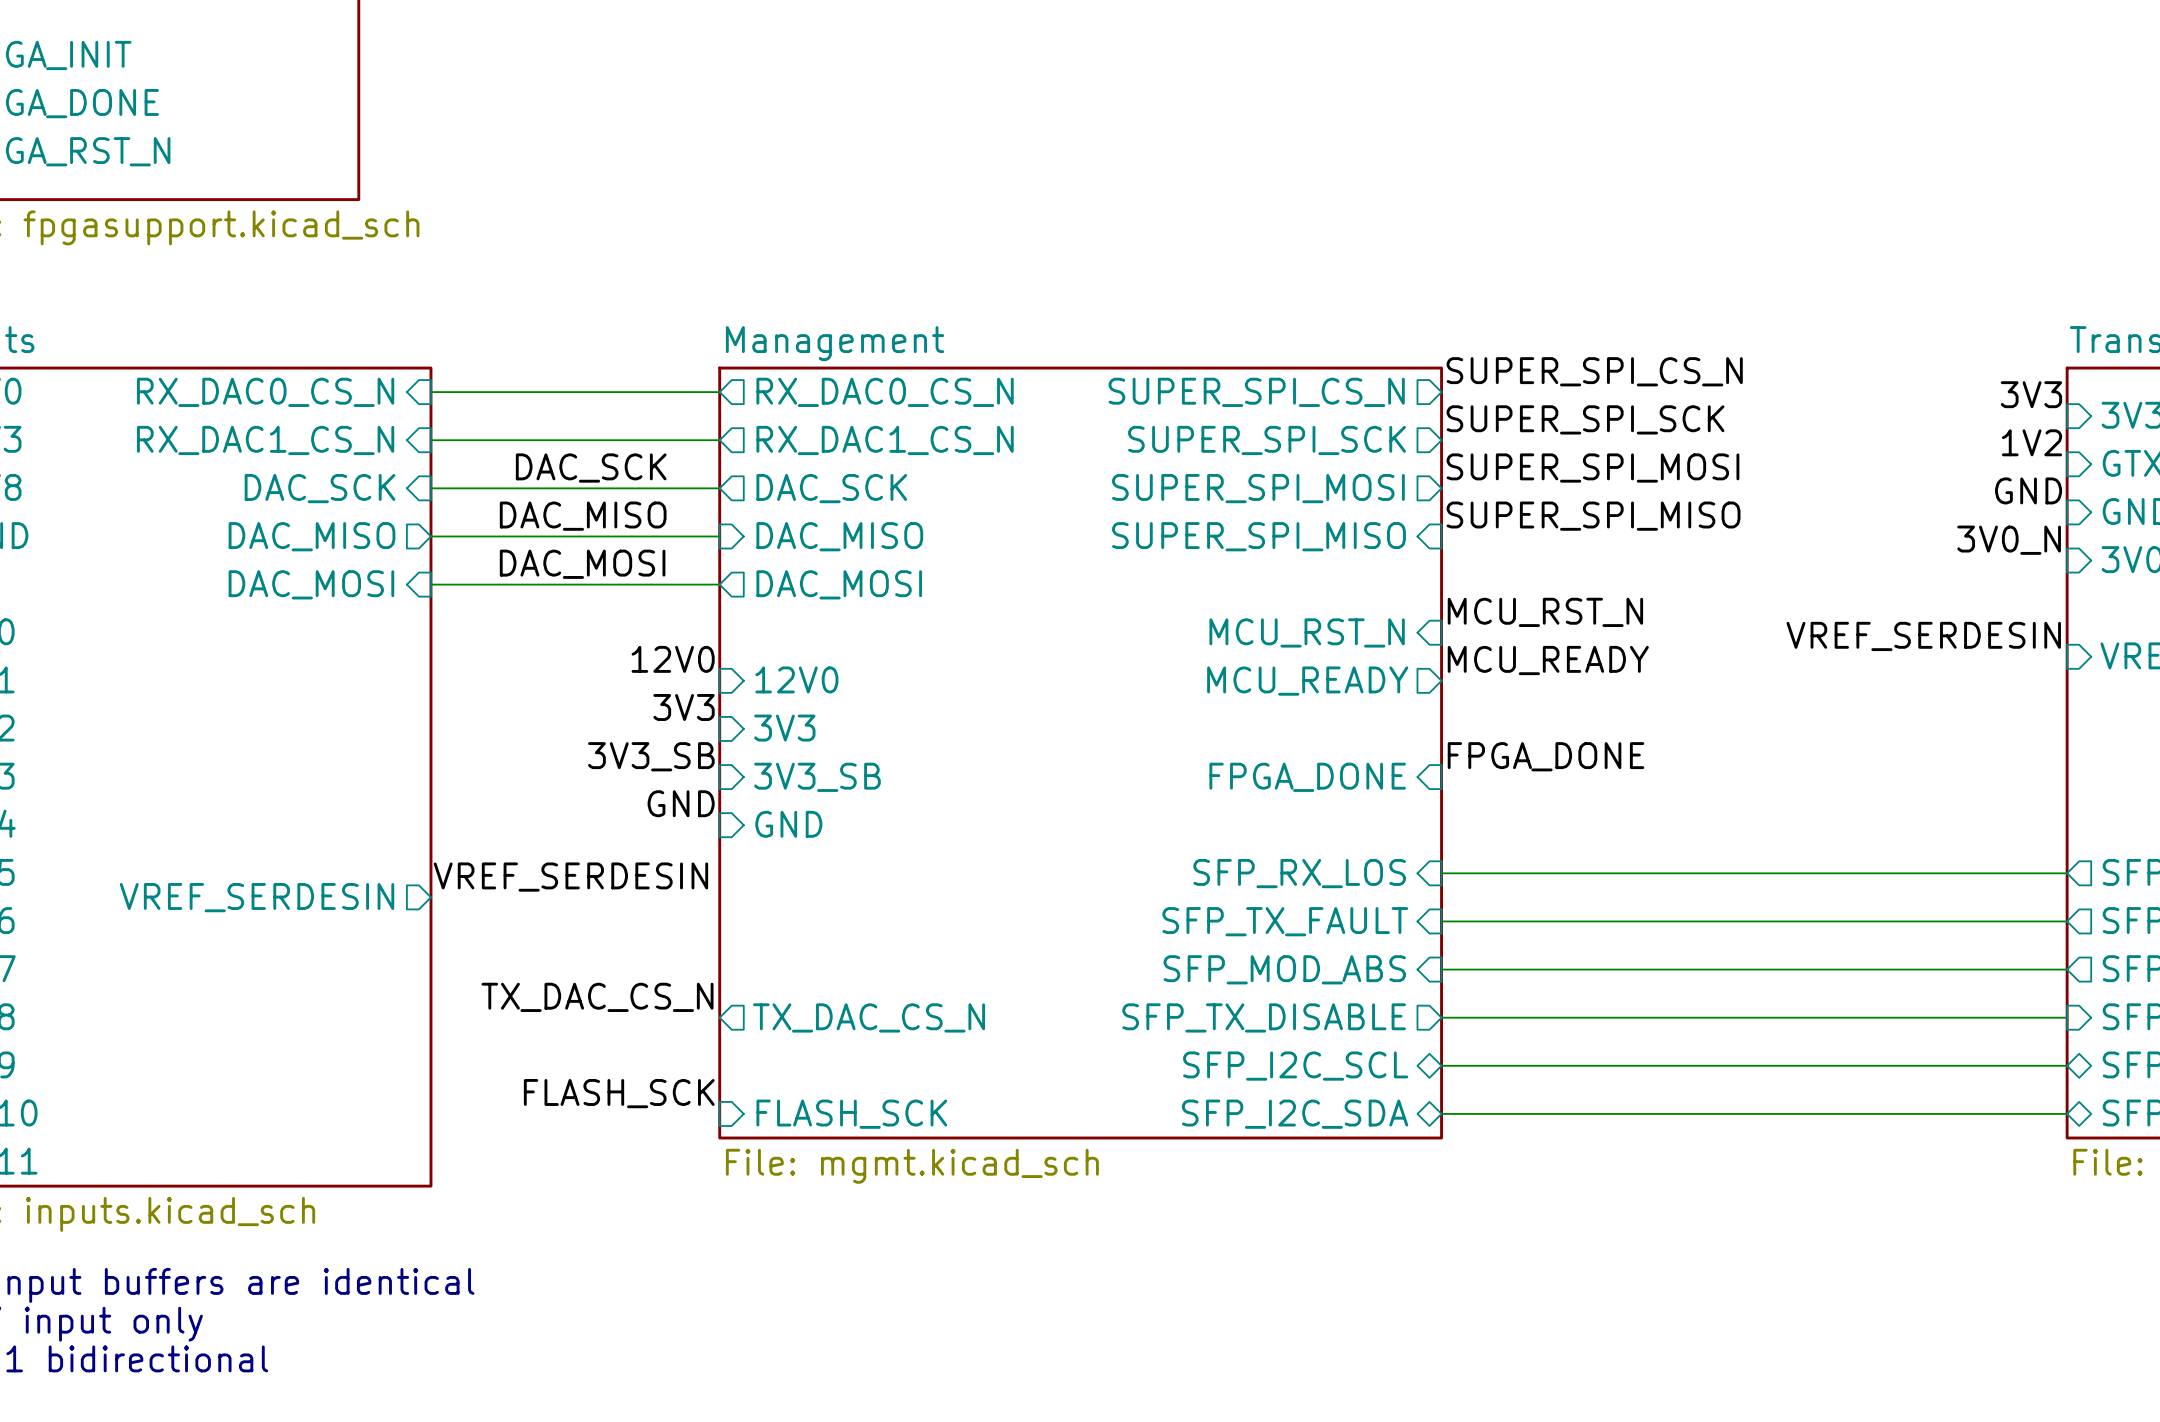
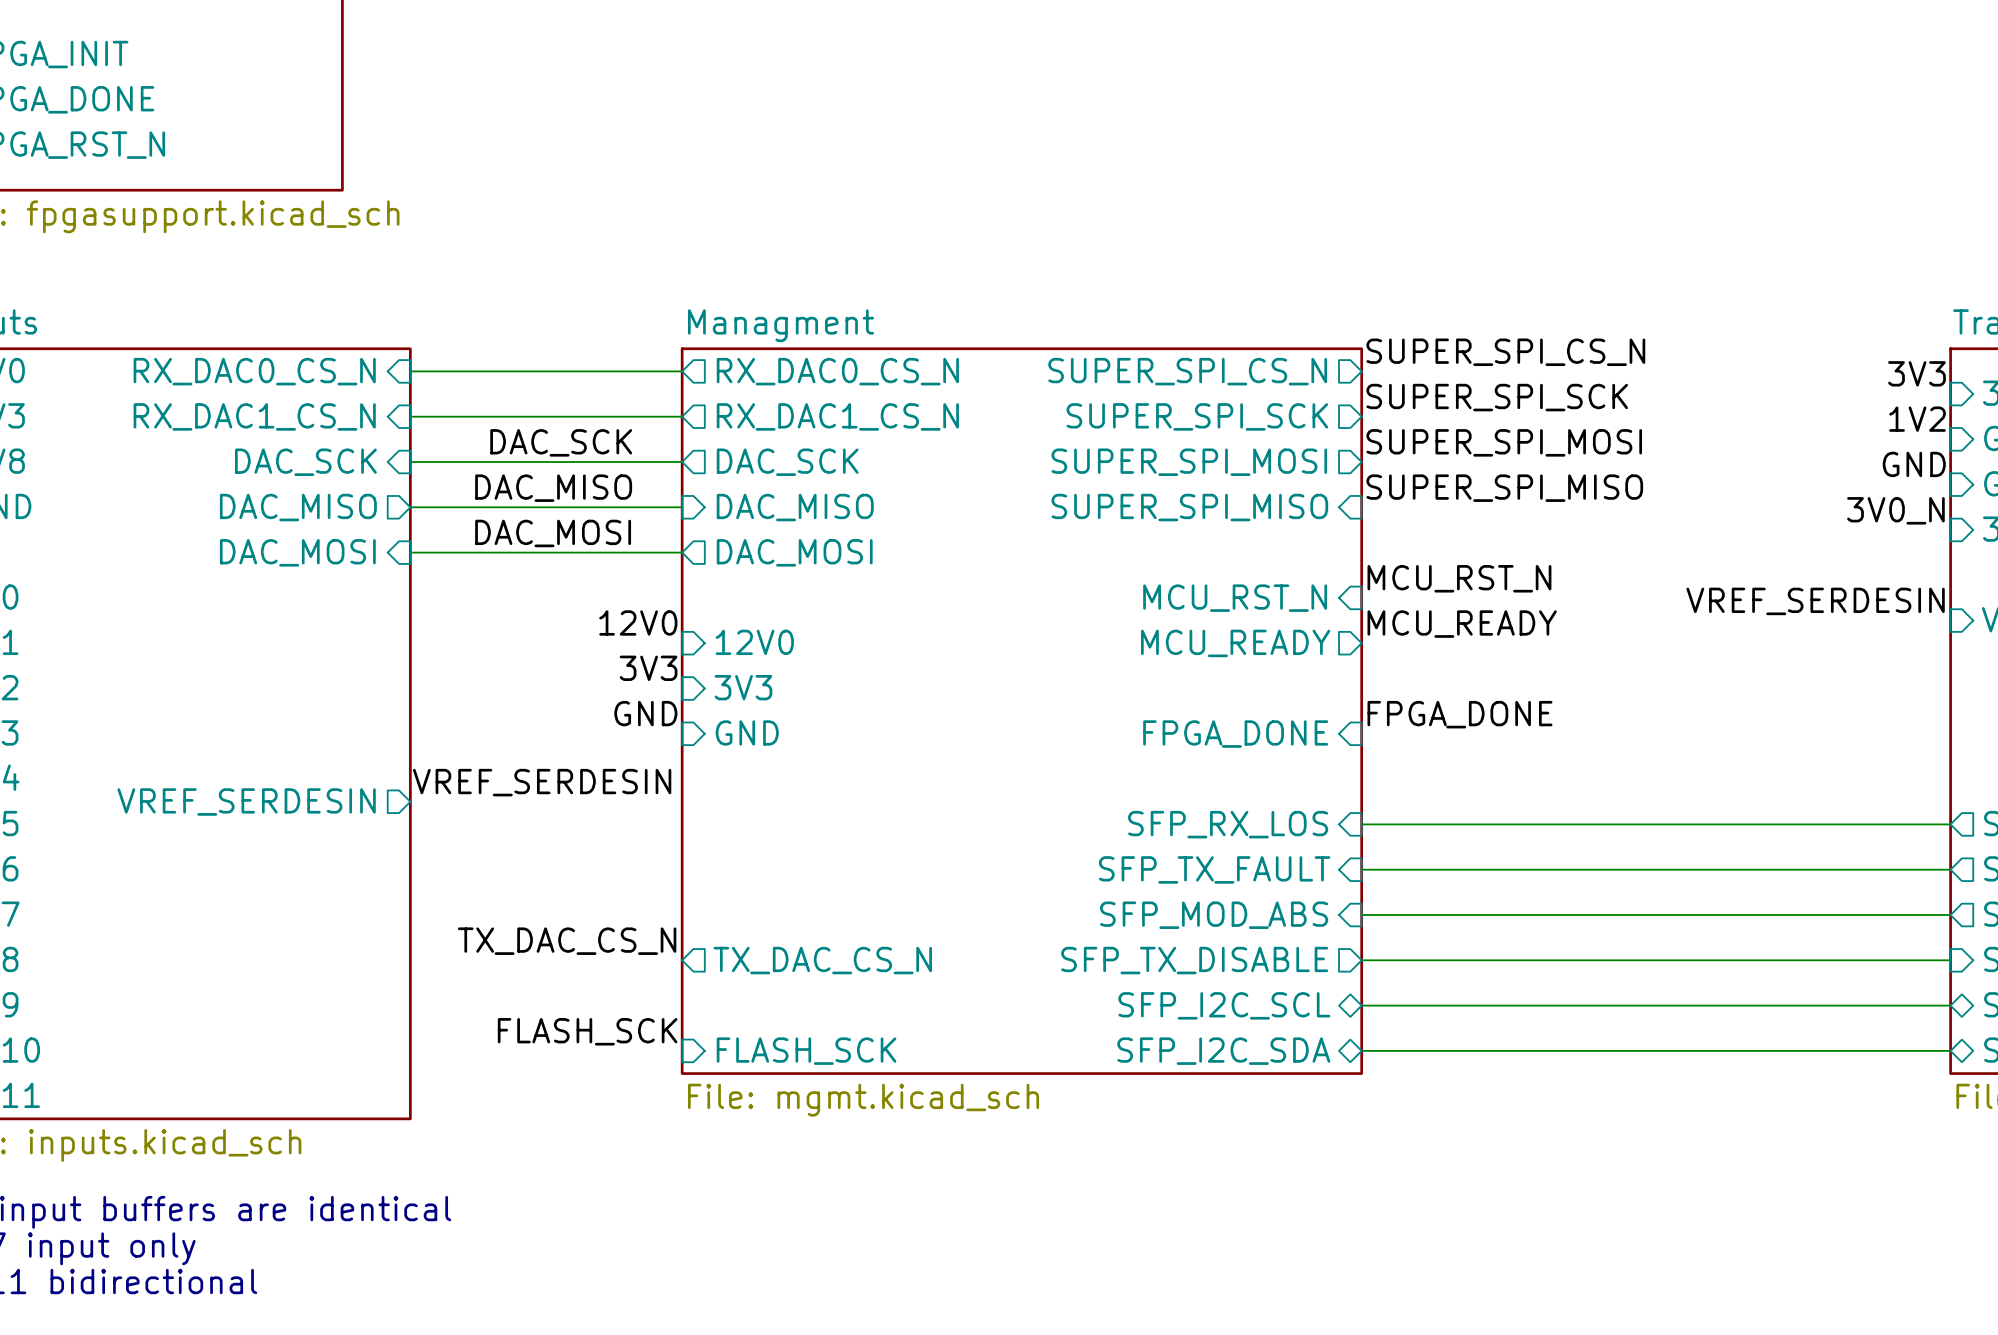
sheet Management name: Management (835, 343) -> Managment (781, 325)
label: 3V3_SB (651, 756) -> GND (645, 713)
sheet pin: 3V3_SB (817, 777) -> GND (747, 732)
label: GND (681, 803) -> none
sheet pin: GND (788, 824) -> none
label position: VREF_SERDESIN (570, 877) -> VREF_SERDESIN (542, 782)
sheet pin position: VREF_SERDESIN (257, 897) -> VREF_SERDESIN (246, 801)

